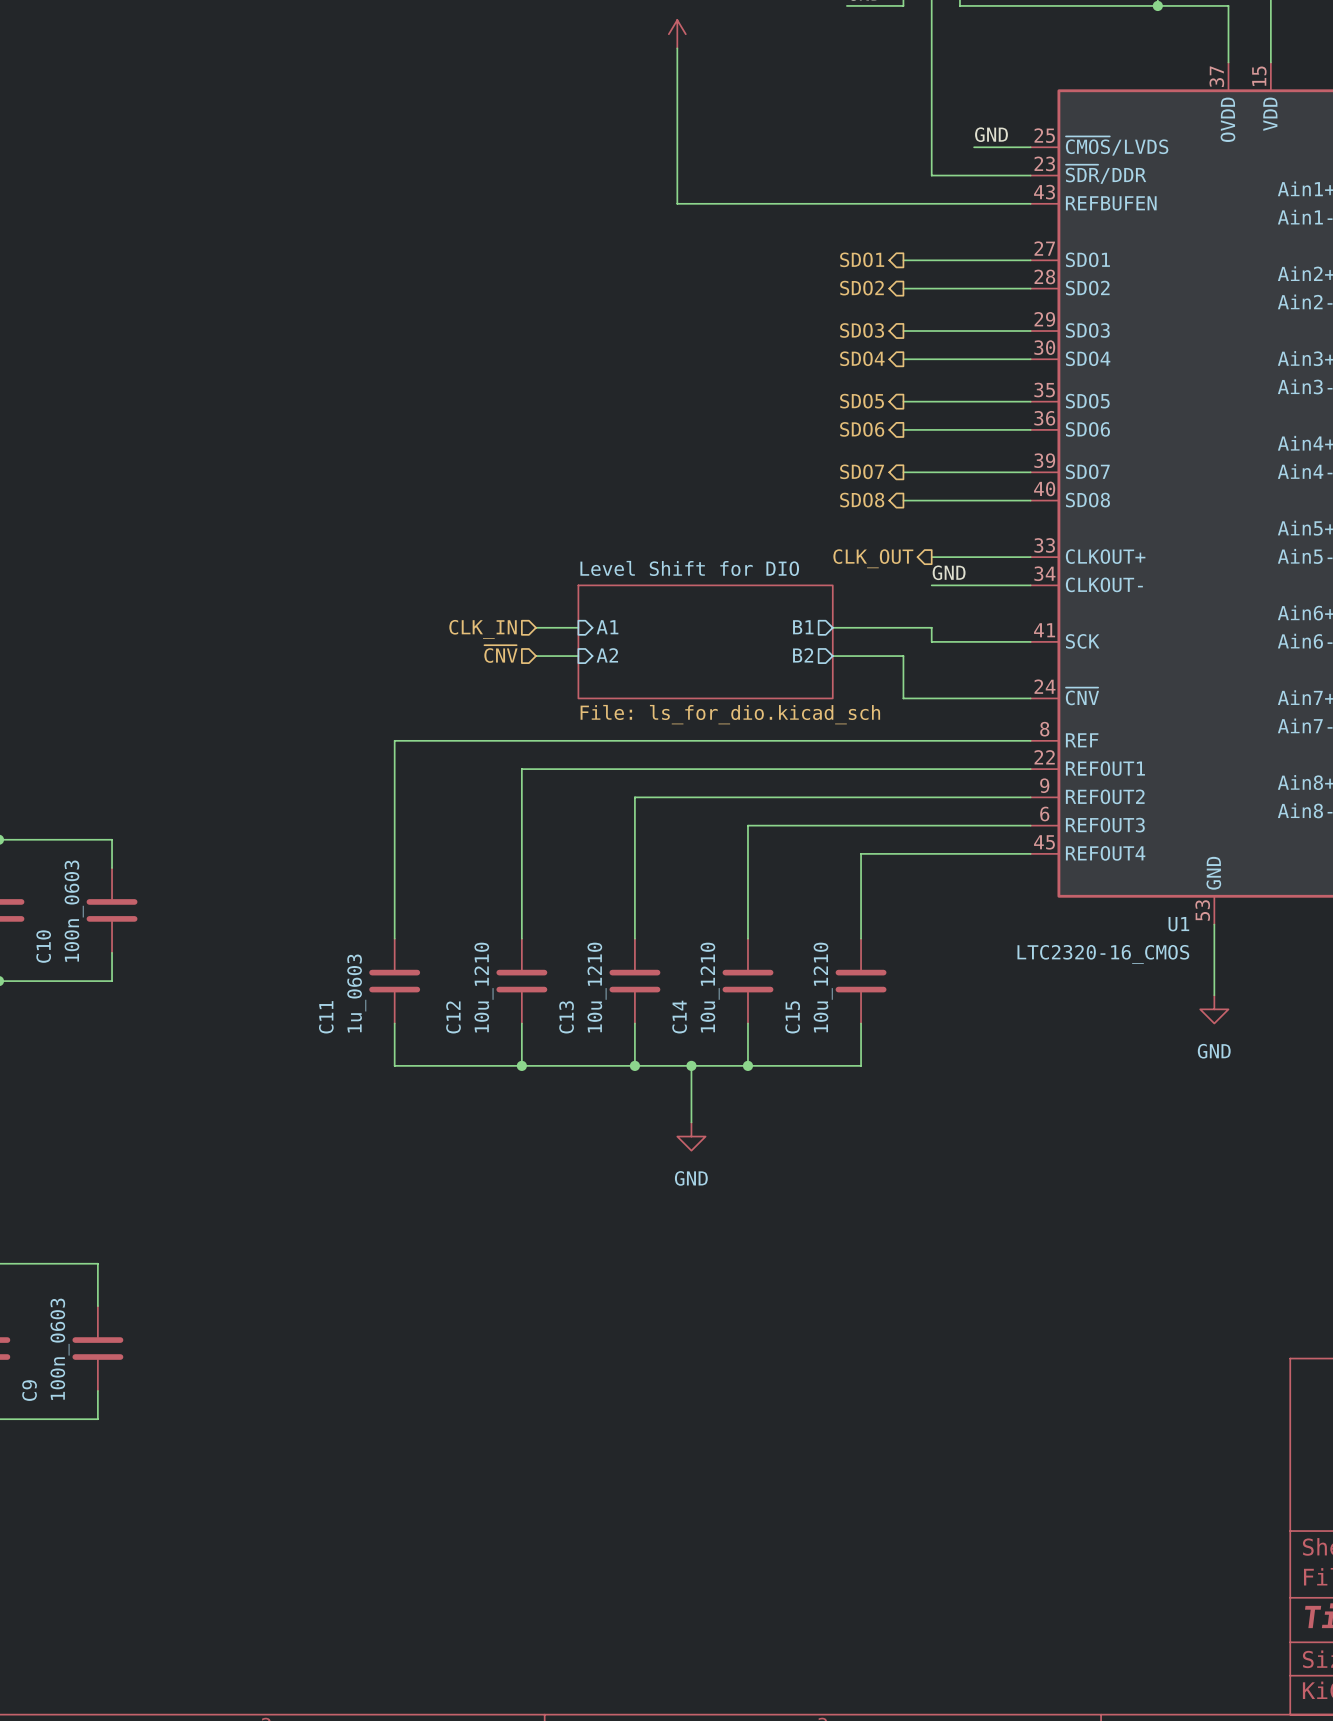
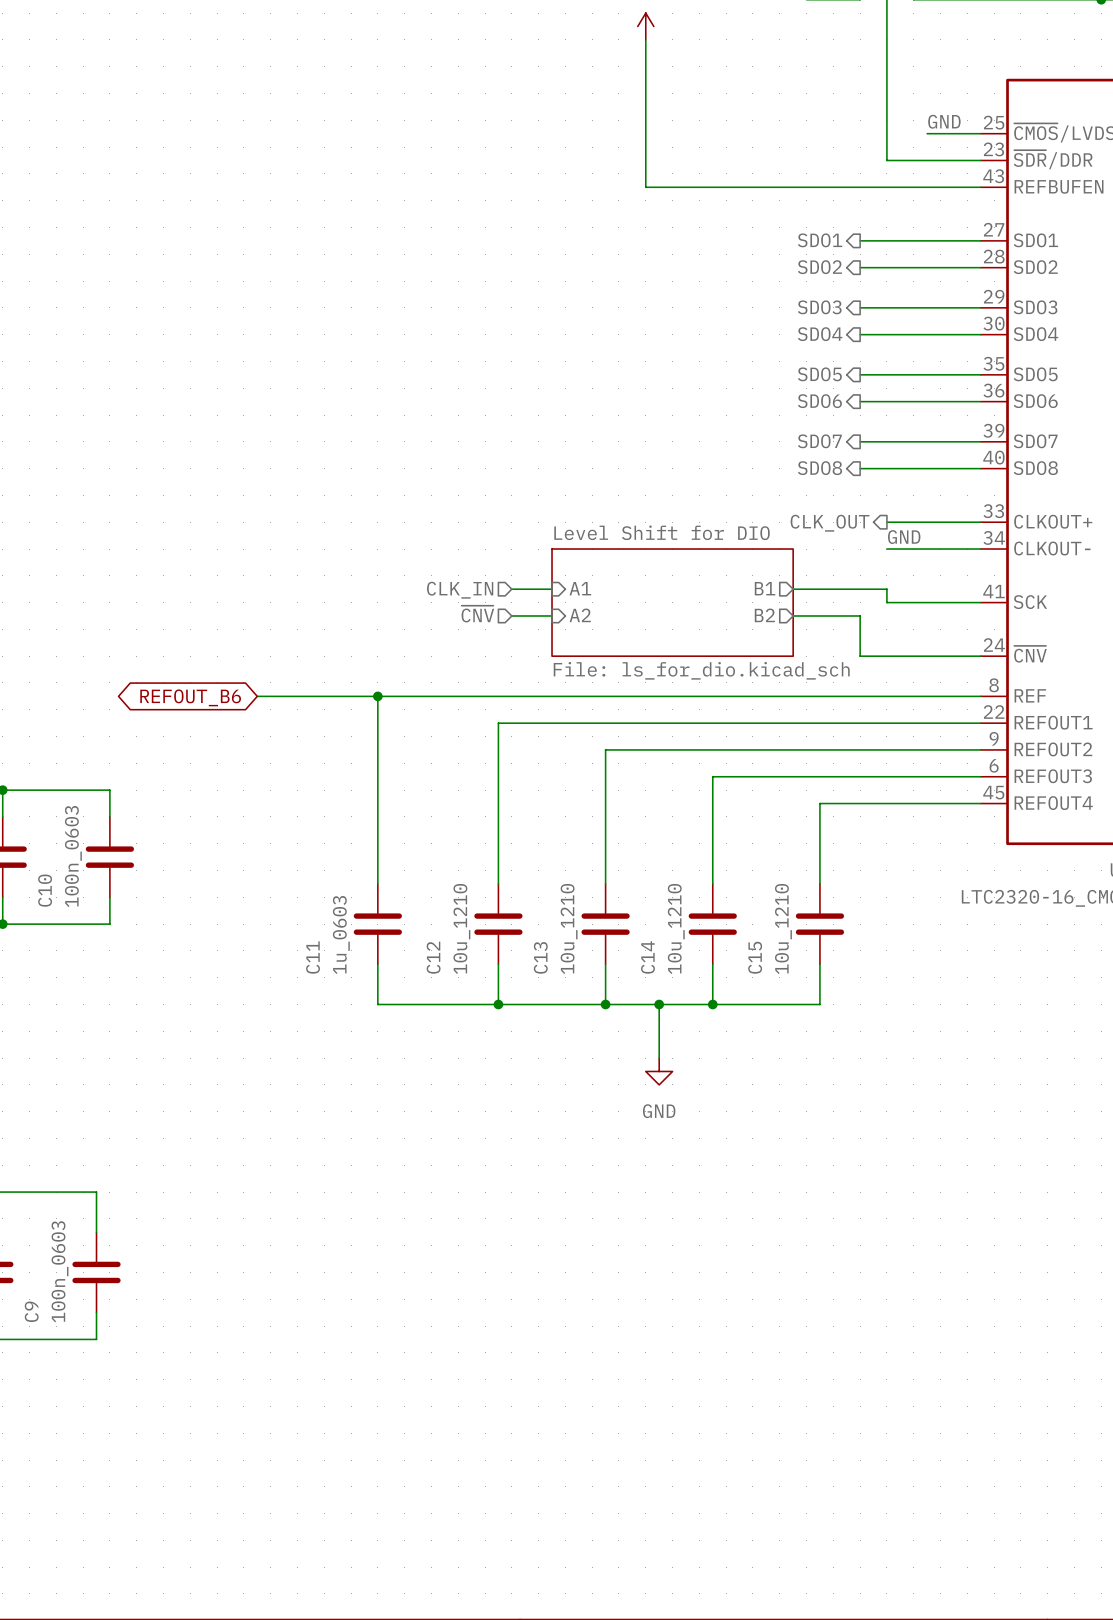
wire: none -> (257, 696) (377, 696)
junction: none -> (377, 696)
global label: none -> REFOUT_B6 (190, 697)

